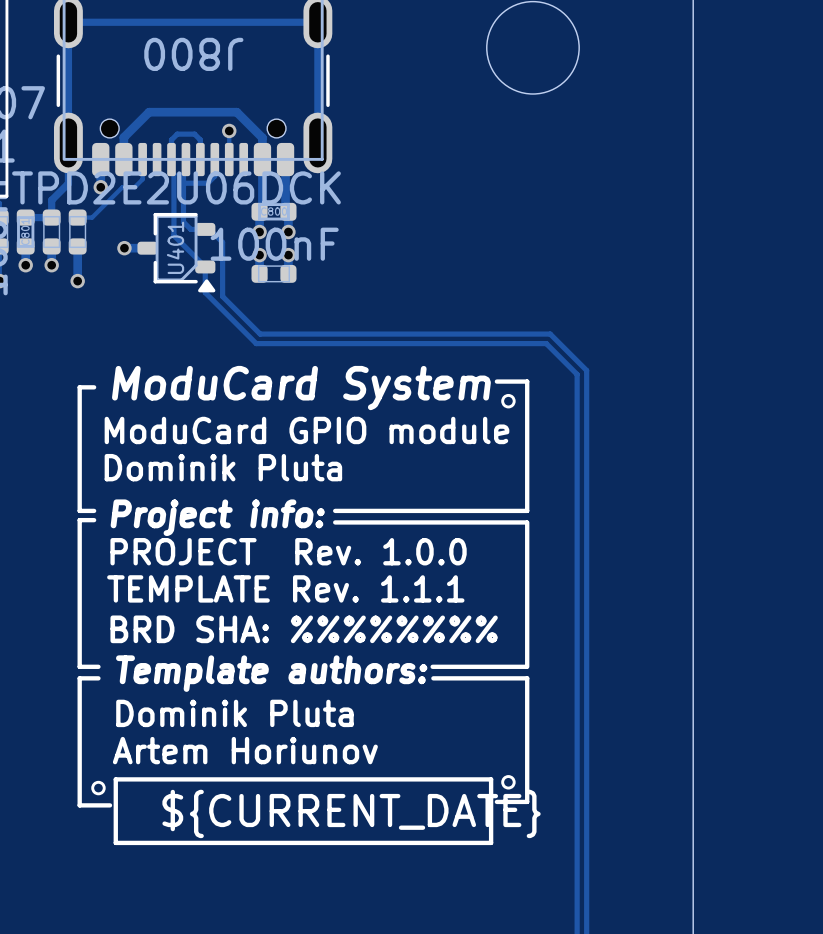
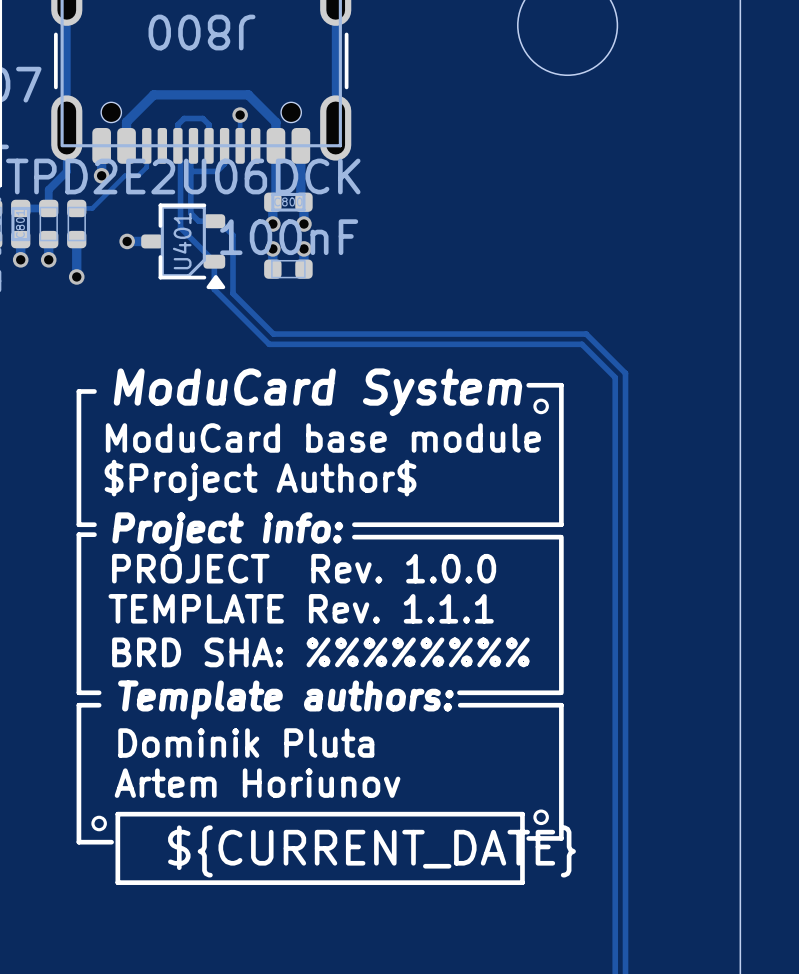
text: ModuCard GPIO module (306, 430) -> ModuCard base module (323, 437)
text: Dominik Pluta (223, 467) -> $Project Author$ (260, 480)

